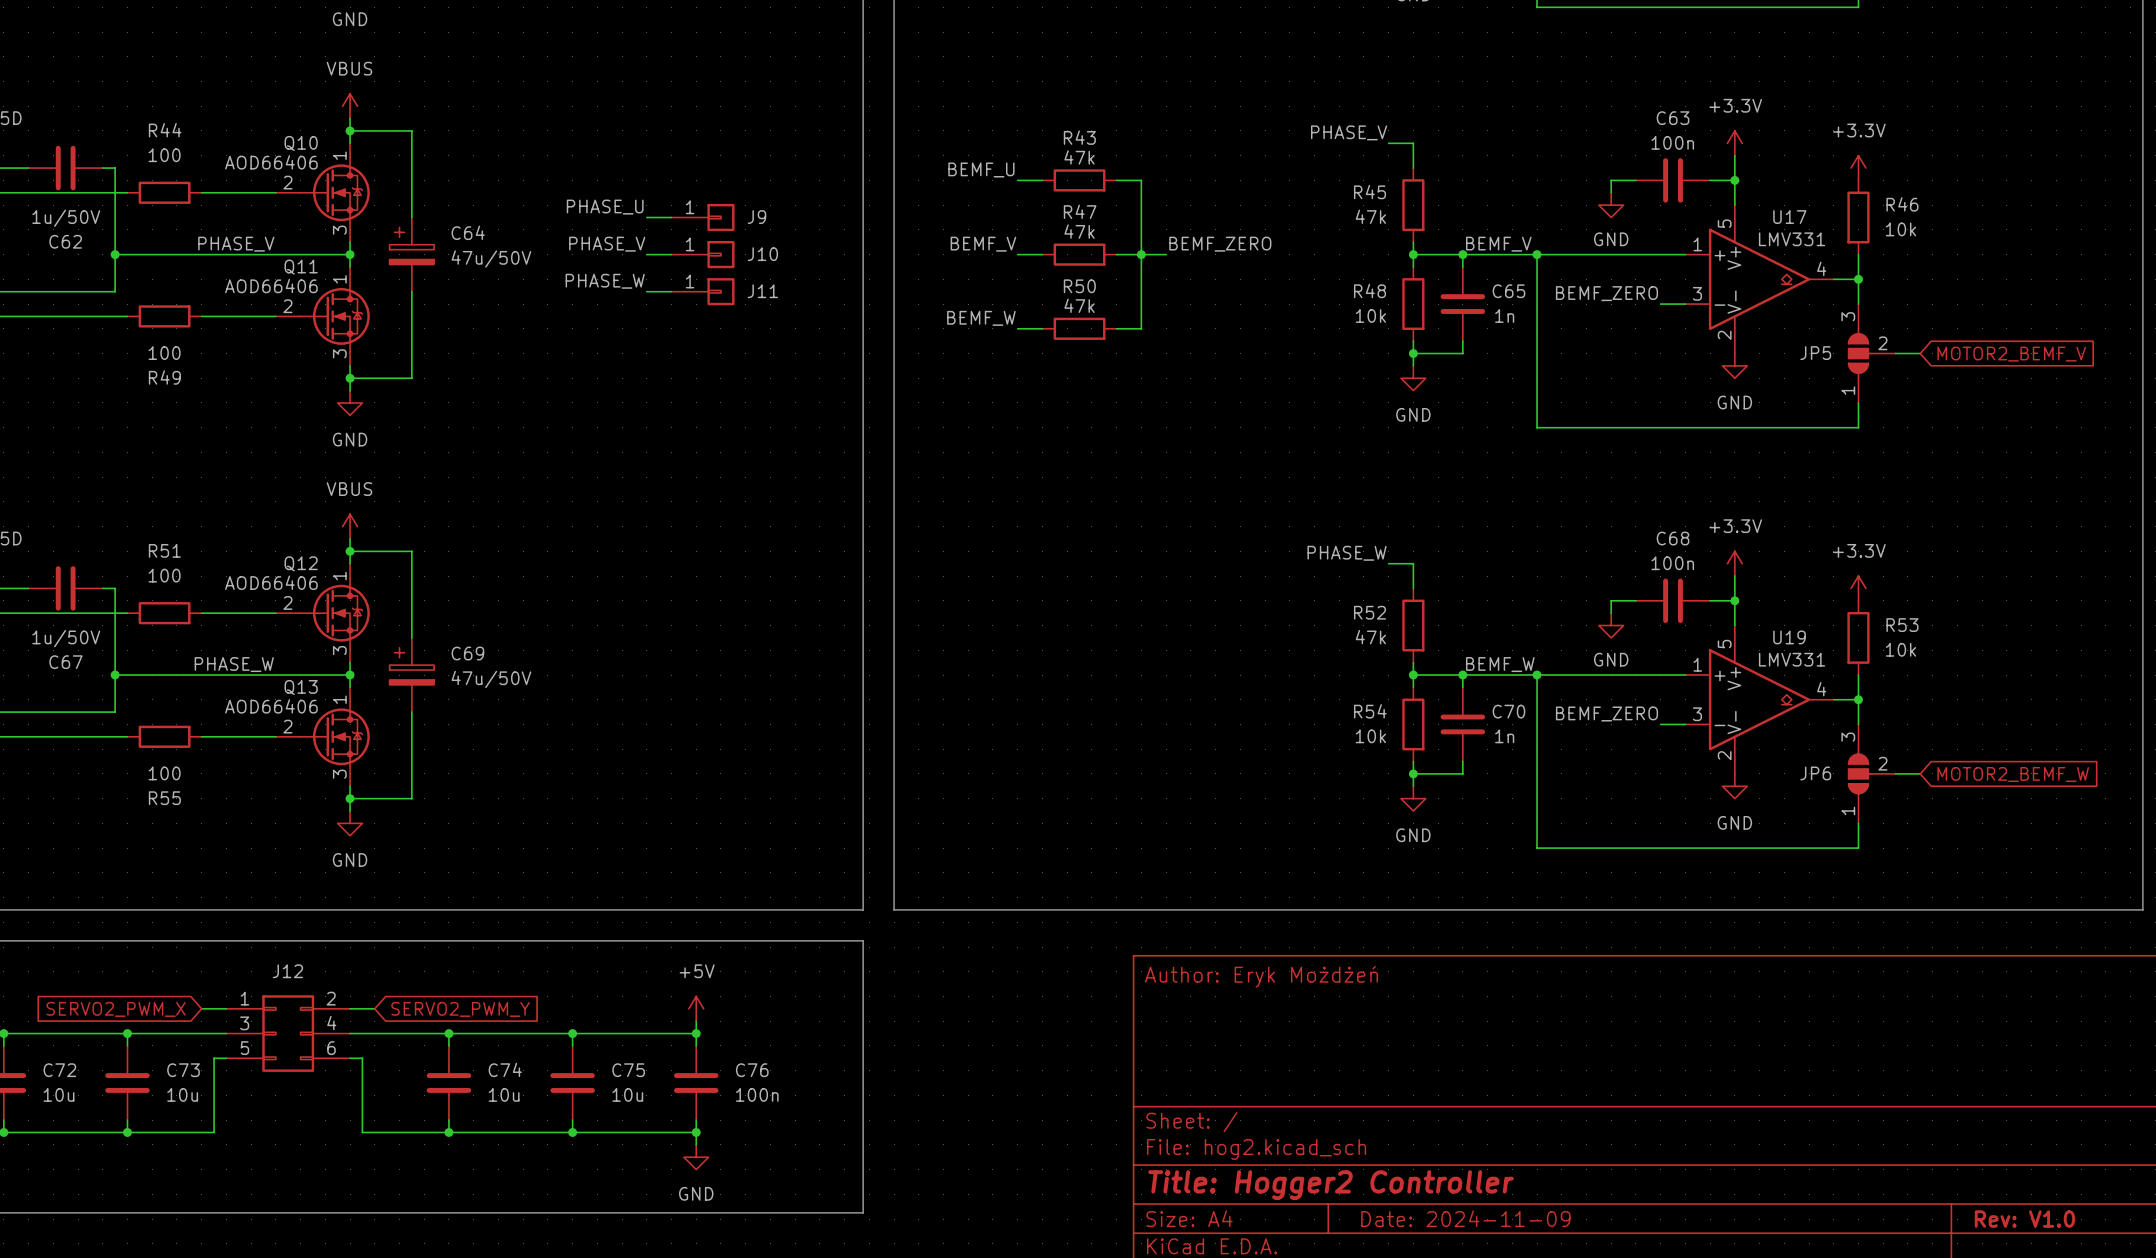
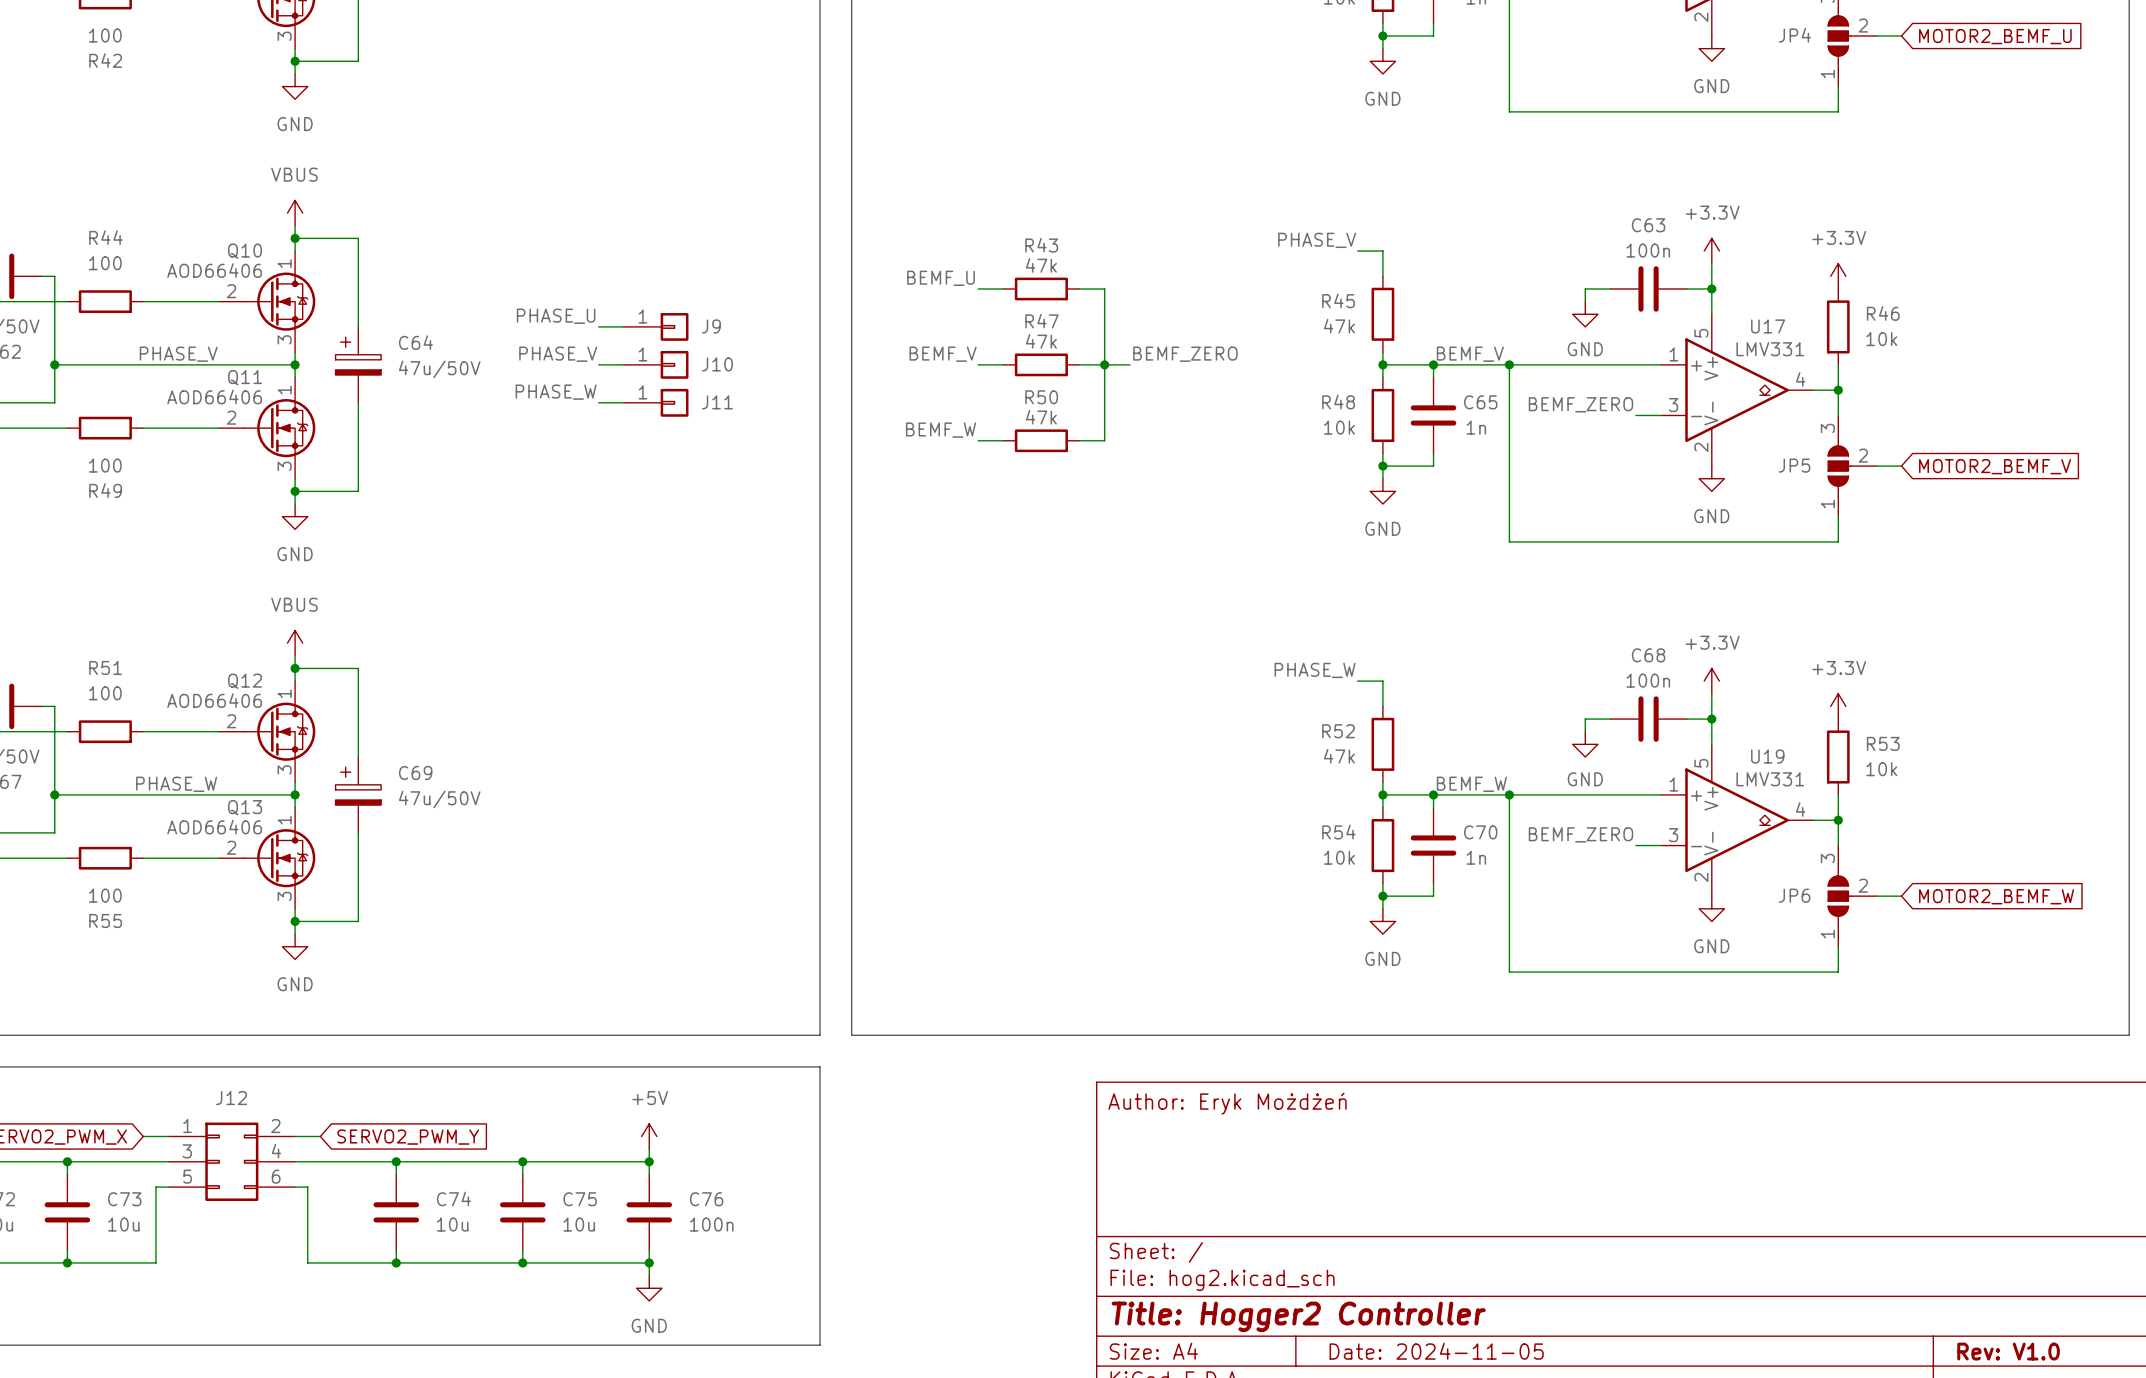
title block: Date: 2024-11-09 (1465, 1218) -> Date: 2024-11-05 (1436, 1351)

